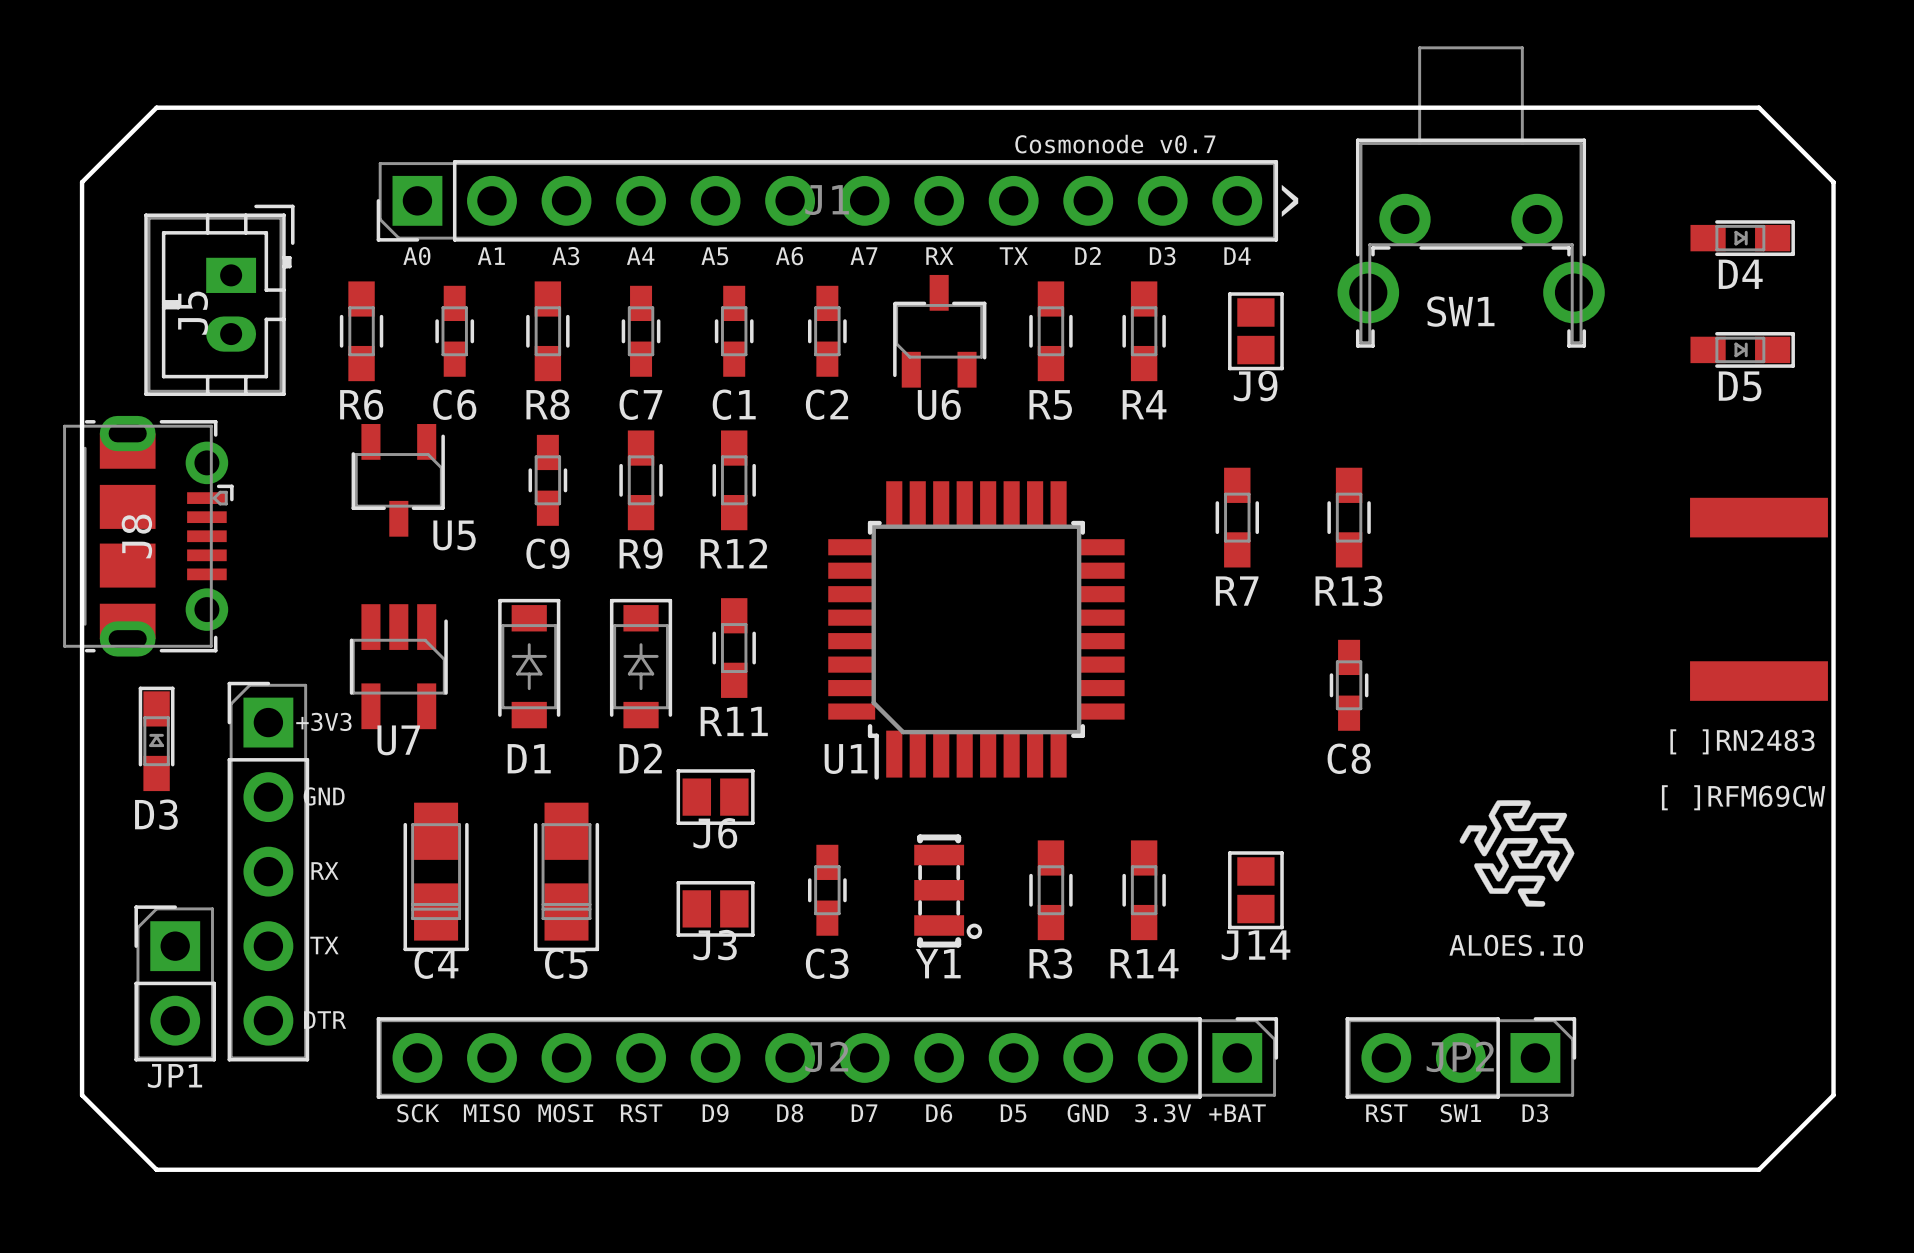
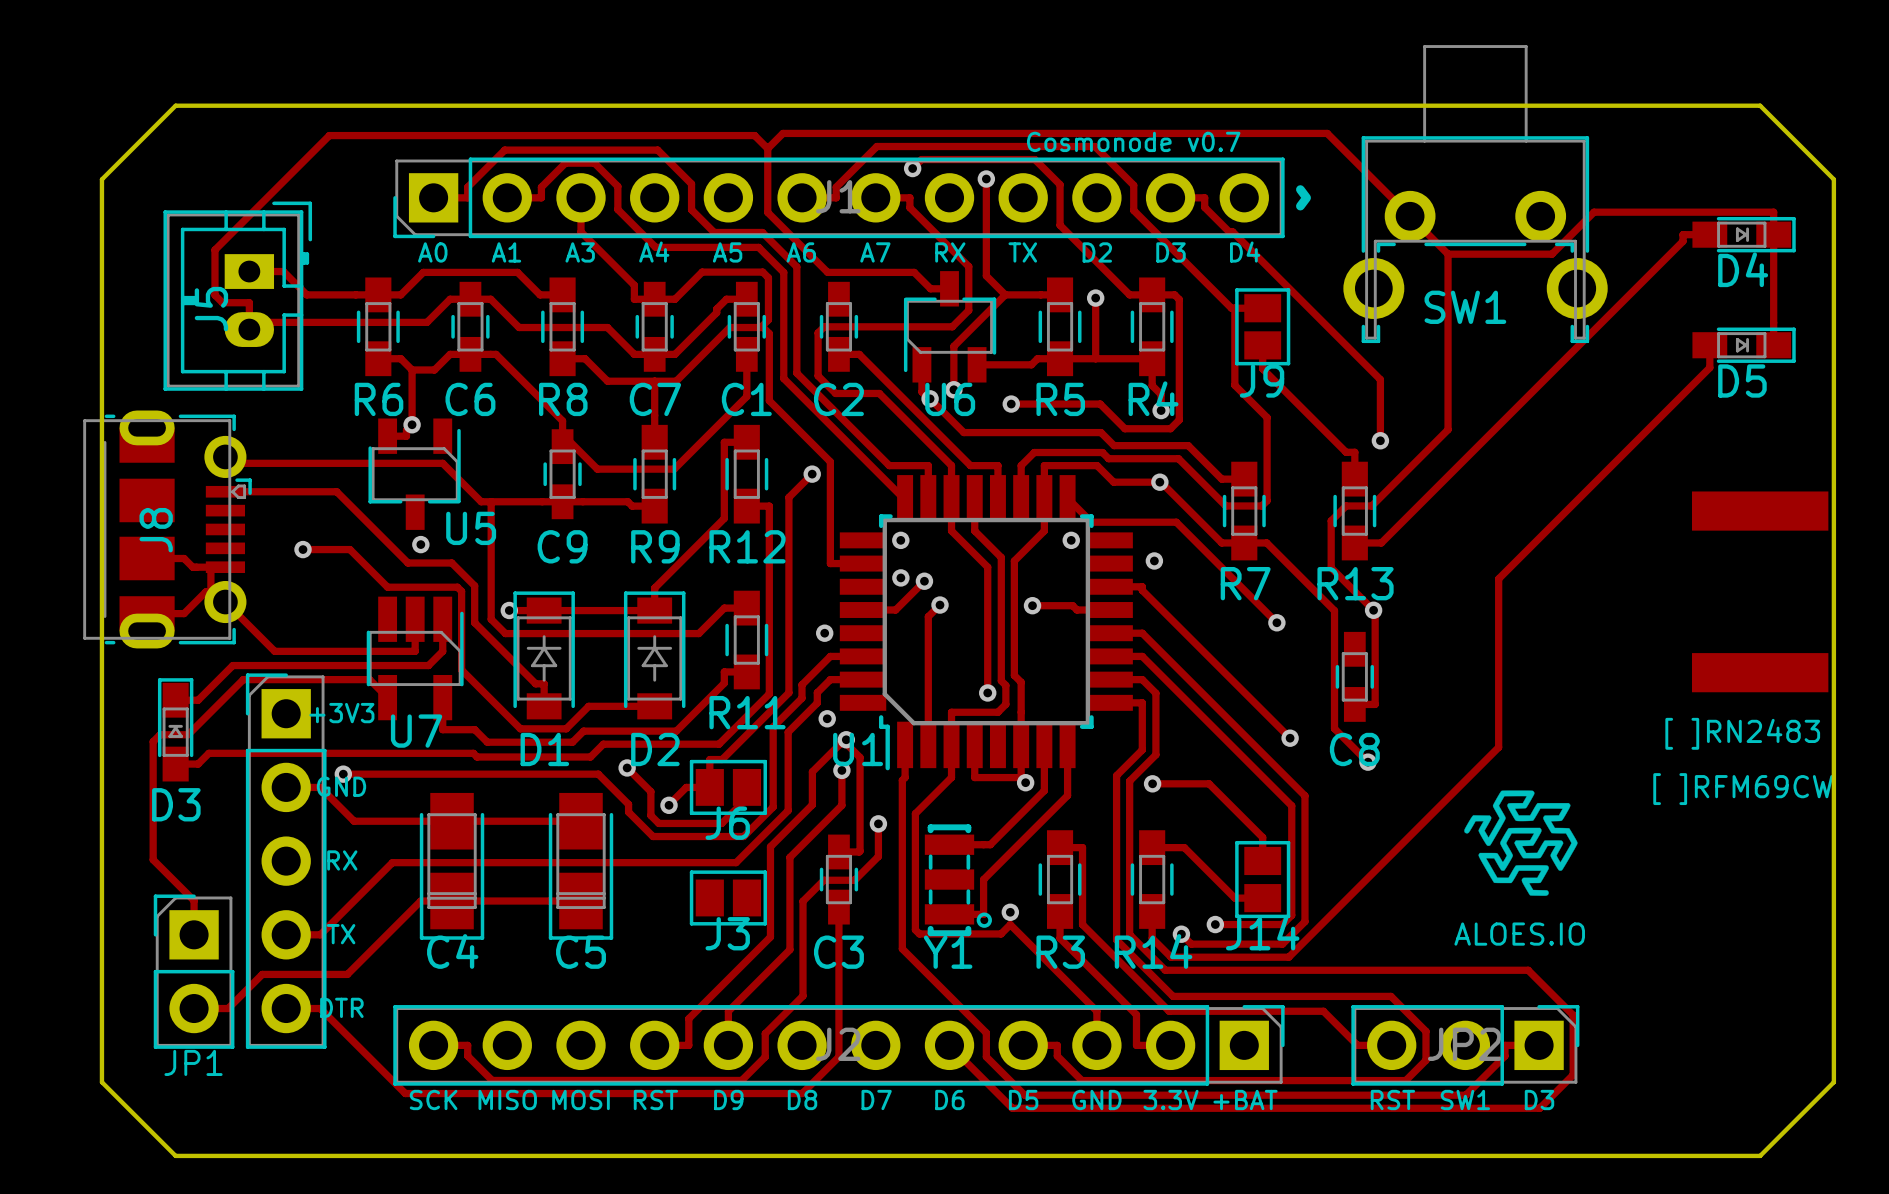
track: none -> (767, 148) (767, 212) (827, 272) (914, 272) (930, 288) (949, 288)
track: none -> (767, 148) (754, 135) (329, 135) (214, 249) (214, 295) (222, 302) (249, 302) (249, 329)
track: none -> (767, 148) (782, 133) (1327, 133) (1448, 254)
track: none -> (912, 168) (921, 159) (1034, 159) (1060, 184) (1060, 225) (1129, 294) (1174, 294) (1179, 299) (1179, 419) (1170, 428) (1124, 428) (1100, 404) (1011, 404)
via: none -> (912, 168)
track: none -> (986, 179) (986, 275) (1005, 294)
via: none -> (986, 179)
track: none -> (433, 197) (467, 197) (467, 187) (504, 150) (657, 150) (691, 183) (691, 209) (714, 232) (762, 232) (796, 266) (796, 373) (889, 465) (928, 465) (928, 498)
track: none -> (507, 197) (541, 197) (541, 187) (565, 163) (594, 163) (617, 186) (617, 209) (655, 247) (758, 247) (783, 272) (783, 378) (905, 498)
track: none -> (581, 197) (581, 231) (634, 285) (634, 299) (675, 299) (702, 272) (762, 272) (768, 277) (768, 319) (760, 327) (729, 327) (676, 381) (607, 381) (585, 358) (562, 358)
track: none -> (802, 197) (836, 197) (836, 187) (876, 146) (1094, 146) (1133, 185) (1133, 210) (1231, 308) (1262, 308)
track: none -> (875, 197) (909, 197) (909, 207) (968, 266) (968, 310) (952, 326) (824, 326) (818, 332) (818, 375) (835, 393) (879, 393) (951, 465) (951, 530) (987, 567) (987, 692)
track: none -> (1170, 197) (1204, 197) (1204, 207) (1229, 231) (1232, 231) (1380, 379) (1380, 440)
track: none -> (1709, 234) (1682, 234) (1682, 241) (1381, 542) (1354, 542)
track: none -> (1448, 254) (1552, 254) (1594, 212) (1773, 212) (1773, 345)
track: none -> (1448, 254) (1448, 429) (1371, 505) (1346, 505) (1331, 520) (1331, 567) (1375, 611) (1375, 704) (1354, 704)
track: none -> (249, 271) (283, 271) (306, 294) (400, 294) (423, 272) (517, 272) (540, 294) (562, 294)
track: none -> (1005, 294) (1060, 294)
track: none -> (1005, 294) (953, 346) (953, 389)
track: none -> (1095, 298) (1095, 358)
via: none -> (1095, 298)
track: none -> (746, 299) (726, 299) (716, 309) (716, 312) (675, 354) (634, 354) (607, 327) (519, 327) (490, 299) (450, 299) (426, 322) (249, 322)
track: none -> (1234, 308) (1234, 385) (1267, 417) (1267, 500) (1261, 505) (1225, 505) (1178, 458) (1108, 458) (1102, 452) (1034, 452) (1021, 465) (1021, 498)
track: none -> (762, 326) (769, 333) (769, 400) (830, 461) (830, 563) (863, 563)
track: none -> (1709, 345) (1709, 367) (1498, 578) (1498, 747) (1288, 957) (1171, 957) (1152, 938) (1152, 911)
track: none -> (1262, 345) (1262, 368) (1346, 452) (1354, 452) (1354, 479)
track: none -> (746, 354) (746, 396) (674, 469) (597, 469) (562, 434)
track: none -> (838, 354) (859, 354) (970, 465) (997, 465) (997, 498)
track: none -> (378, 358) (400, 358) (412, 369)
track: none -> (921, 364) (921, 391) (963, 432) (1101, 432) (1114, 445) (1188, 445) (1221, 479) (1244, 479)
track: none -> (977, 364) (1031, 364) (1037, 358) (1152, 358) (1152, 385) (1161, 394) (1161, 410)
track: none -> (412, 369) (434, 369) (450, 354) (496, 354) (562, 420) (562, 446)
track: none -> (412, 369) (412, 424) (406, 430) (406, 436) (387, 436)
track: none -> (654, 381) (654, 442)
via: none -> (953, 389)
via: none -> (930, 398)
via: none -> (1011, 404)
via: none -> (1161, 410)
via: none -> (412, 424)
via: none -> (1380, 440)
track: none -> (746, 442) (724, 442) (724, 518) (654, 588) (654, 610) (509, 610)
track: none -> (225, 456) (231, 463) (442, 463) (481, 501) (627, 501) (632, 506) (654, 506)
track: none -> (812, 474) (788, 497) (788, 692) (722, 759) (709, 759) (709, 787) (686, 787) (669, 805)
via: none -> (812, 474)
via: none -> (1159, 482)
track: none -> (225, 491) (336, 491) (407, 563) (451, 563) (474, 585) (474, 622) (535, 683) (544, 683) (544, 706)
track: none -> (974, 498) (974, 530) (1001, 557) (1001, 680) (1005, 685) (1005, 704) (997, 712) (951, 712) (951, 777) (915, 813) (915, 929) (919, 933) (1001, 933) (1010, 924) (1096, 1011) (1096, 1045)
track: none -> (1067, 498) (1091, 522) (1176, 522) (1276, 622)
track: none -> (491, 501) (491, 619) (505, 633) (698, 633) (724, 608) (746, 608)
track: none -> (746, 506) (769, 506) (769, 693) (719, 744) (603, 744) (590, 757) (477, 757) (473, 753) (208, 753) (198, 764) (175, 764)
via: none -> (900, 540)
via: none -> (1071, 540)
via: none -> (420, 544)
track: none -> (303, 549) (349, 549) (387, 587) (457, 587) (461, 591) (461, 669) (520, 728) (566, 728) (588, 706) (654, 706)
via: none -> (303, 549)
track: none -> (147, 558) (184, 558) (192, 567) (225, 567)
via: none -> (1154, 560)
track: none -> (210, 567) (210, 591)
via: none -> (900, 577)
track: none -> (924, 581) (895, 609) (863, 609)
via: none -> (924, 581)
track: none -> (1109, 586) (1142, 586) (1142, 590) (1290, 738)
track: none -> (940, 605) (928, 616) (928, 744)
via: none -> (940, 605)
track: none -> (1032, 605) (1072, 605) (1077, 609) (1109, 609)
via: none -> (1032, 605)
via: none -> (1373, 610)
via: none -> (509, 610)
track: none -> (415, 619) (415, 651) (274, 651) (215, 591) (205, 591) (184, 613) (147, 613) (147, 631)
track: none -> (442, 619) (442, 651) (428, 665) (232, 665) (198, 700) (175, 700)
via: none -> (1276, 622)
via: none -> (824, 633)
track: none -> (1109, 633) (1142, 633) (1304, 795) (1304, 921) (1282, 944) (1191, 944) (1181, 934)
track: none -> (863, 656) (830, 656) (801, 684) (801, 698) (773, 727) (773, 807) (743, 836) (652, 836) (628, 812) (628, 804) (598, 774) (343, 774)
track: none -> (1109, 656) (1142, 656) (1291, 805) (1291, 915) (1282, 924) (1215, 924)
track: none -> (746, 671) (724, 671) (724, 683) (676, 731) (583, 731) (572, 742) (487, 742) (474, 729) (442, 729) (442, 697)
track: none -> (863, 679) (830, 679) (817, 692) (817, 703) (788, 732) (788, 810) (736, 862) (392, 862) (320, 934) (286, 934)
track: none -> (1109, 679) (1142, 679) (1155, 693) (1155, 754) (1129, 781) (1129, 934) (1165, 970) (1528, 970) (1573, 1015) (1573, 1074) (1539, 1108) (1012, 1108) (949, 1045)
via: none -> (987, 692)
track: none -> (387, 697) (369, 679) (243, 679) (188, 734) (160, 734) (153, 741) (153, 859) (194, 900) (194, 934)
track: none -> (1109, 702) (1142, 702) (1142, 749) (1116, 775) (1116, 939) (1173, 996) (1391, 996) (1425, 1031) (1425, 1060) (1405, 1080) (1081, 1080) (1057, 1056) (1057, 1045) (1023, 1045)
via: none -> (827, 718)
via: none -> (1290, 738)
via: none -> (846, 739)
track: none -> (846, 743) (840, 743) (812, 771) (812, 804) (770, 846) (770, 937) (688, 1018) (688, 1045) (654, 1045)
track: none -> (846, 743) (860, 757) (860, 851) (838, 851)
track: none -> (905, 744) (905, 777) (902, 780) (902, 948) (986, 1032) (986, 1056) (1024, 1095) (1465, 1095) (1504, 1056) (1504, 1045) (1539, 1045)
track: none -> (974, 744) (974, 777) (1021, 777)
track: none -> (1044, 744) (1044, 790) (990, 844) (949, 844)
track: none -> (1067, 744) (1067, 795) (983, 879) (983, 914) (949, 914)
track: none -> (1367, 762) (1334, 728) (1334, 610) (1266, 542) (1221, 542) (1161, 482) (1113, 482) (1097, 465) (1044, 465) (1044, 530) (1014, 560) (1014, 675) (1021, 682) (1021, 778) (1025, 782)
via: none -> (1367, 762)
track: none -> (627, 767) (650, 791) (650, 815) (658, 823) (721, 823) (746, 798) (746, 787)
via: none -> (627, 767)
track: none -> (841, 770) (841, 805) (789, 857) (789, 949) (728, 1011) (728, 1045)
via: none -> (841, 770)
via: none -> (343, 774)
via: none -> (1025, 782)
track: none -> (1152, 783) (1209, 783) (1262, 837) (1262, 860)
via: none -> (1152, 783)
track: none -> (286, 787) (320, 787) (354, 821) (581, 821)
via: none -> (669, 805)
track: none -> (878, 823) (878, 856) (854, 880) (824, 880) (803, 901) (803, 995) (765, 1033) (765, 1057) (741, 1080) (492, 1080) (467, 1056) (467, 1045) (433, 1045)
via: none -> (878, 823)
track: none -> (1060, 847) (1082, 847) (1082, 924) (1169, 1011) (1323, 1011) (1357, 1045) (1391, 1045)
track: none -> (1152, 847) (1184, 847) (1234, 898) (1262, 898)
track: none -> (581, 901) (420, 901) (347, 974) (262, 974) (228, 1008) (194, 1008)
track: none -> (838, 907) (838, 1056) (802, 1093) (405, 1093) (320, 1008) (286, 1008)
track: none -> (1060, 911) (1060, 938) (1136, 1014) (1136, 1045) (1170, 1045)
via: none -> (1010, 912)
via: none -> (1215, 924)
via: none -> (1181, 934)

